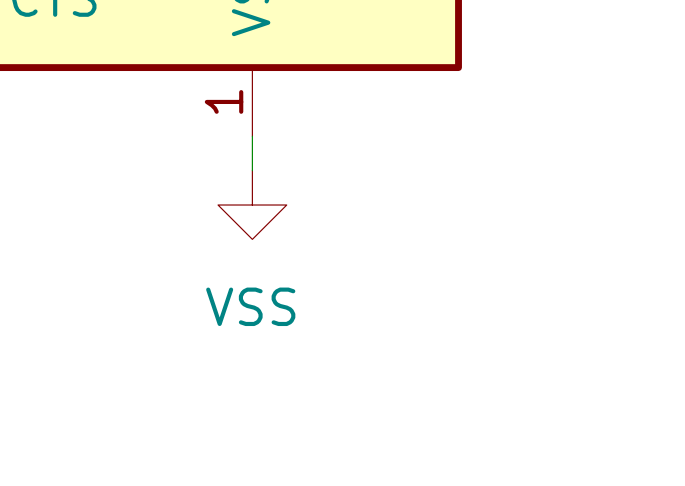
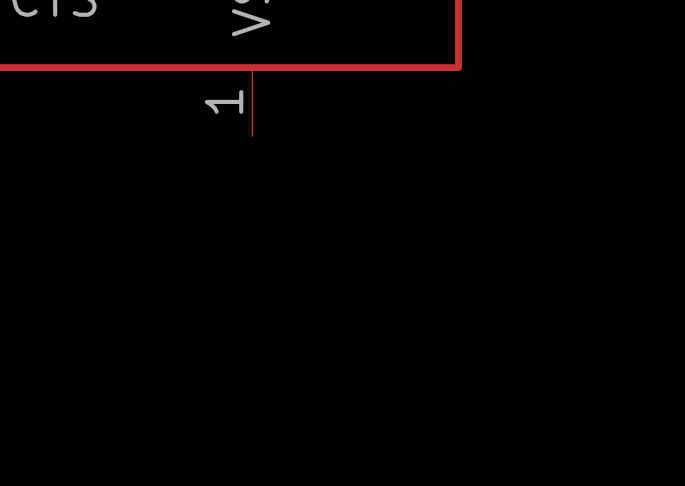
wire: (252, 136) (252, 170) -> none
power symbol: VSS (252, 205) -> none

